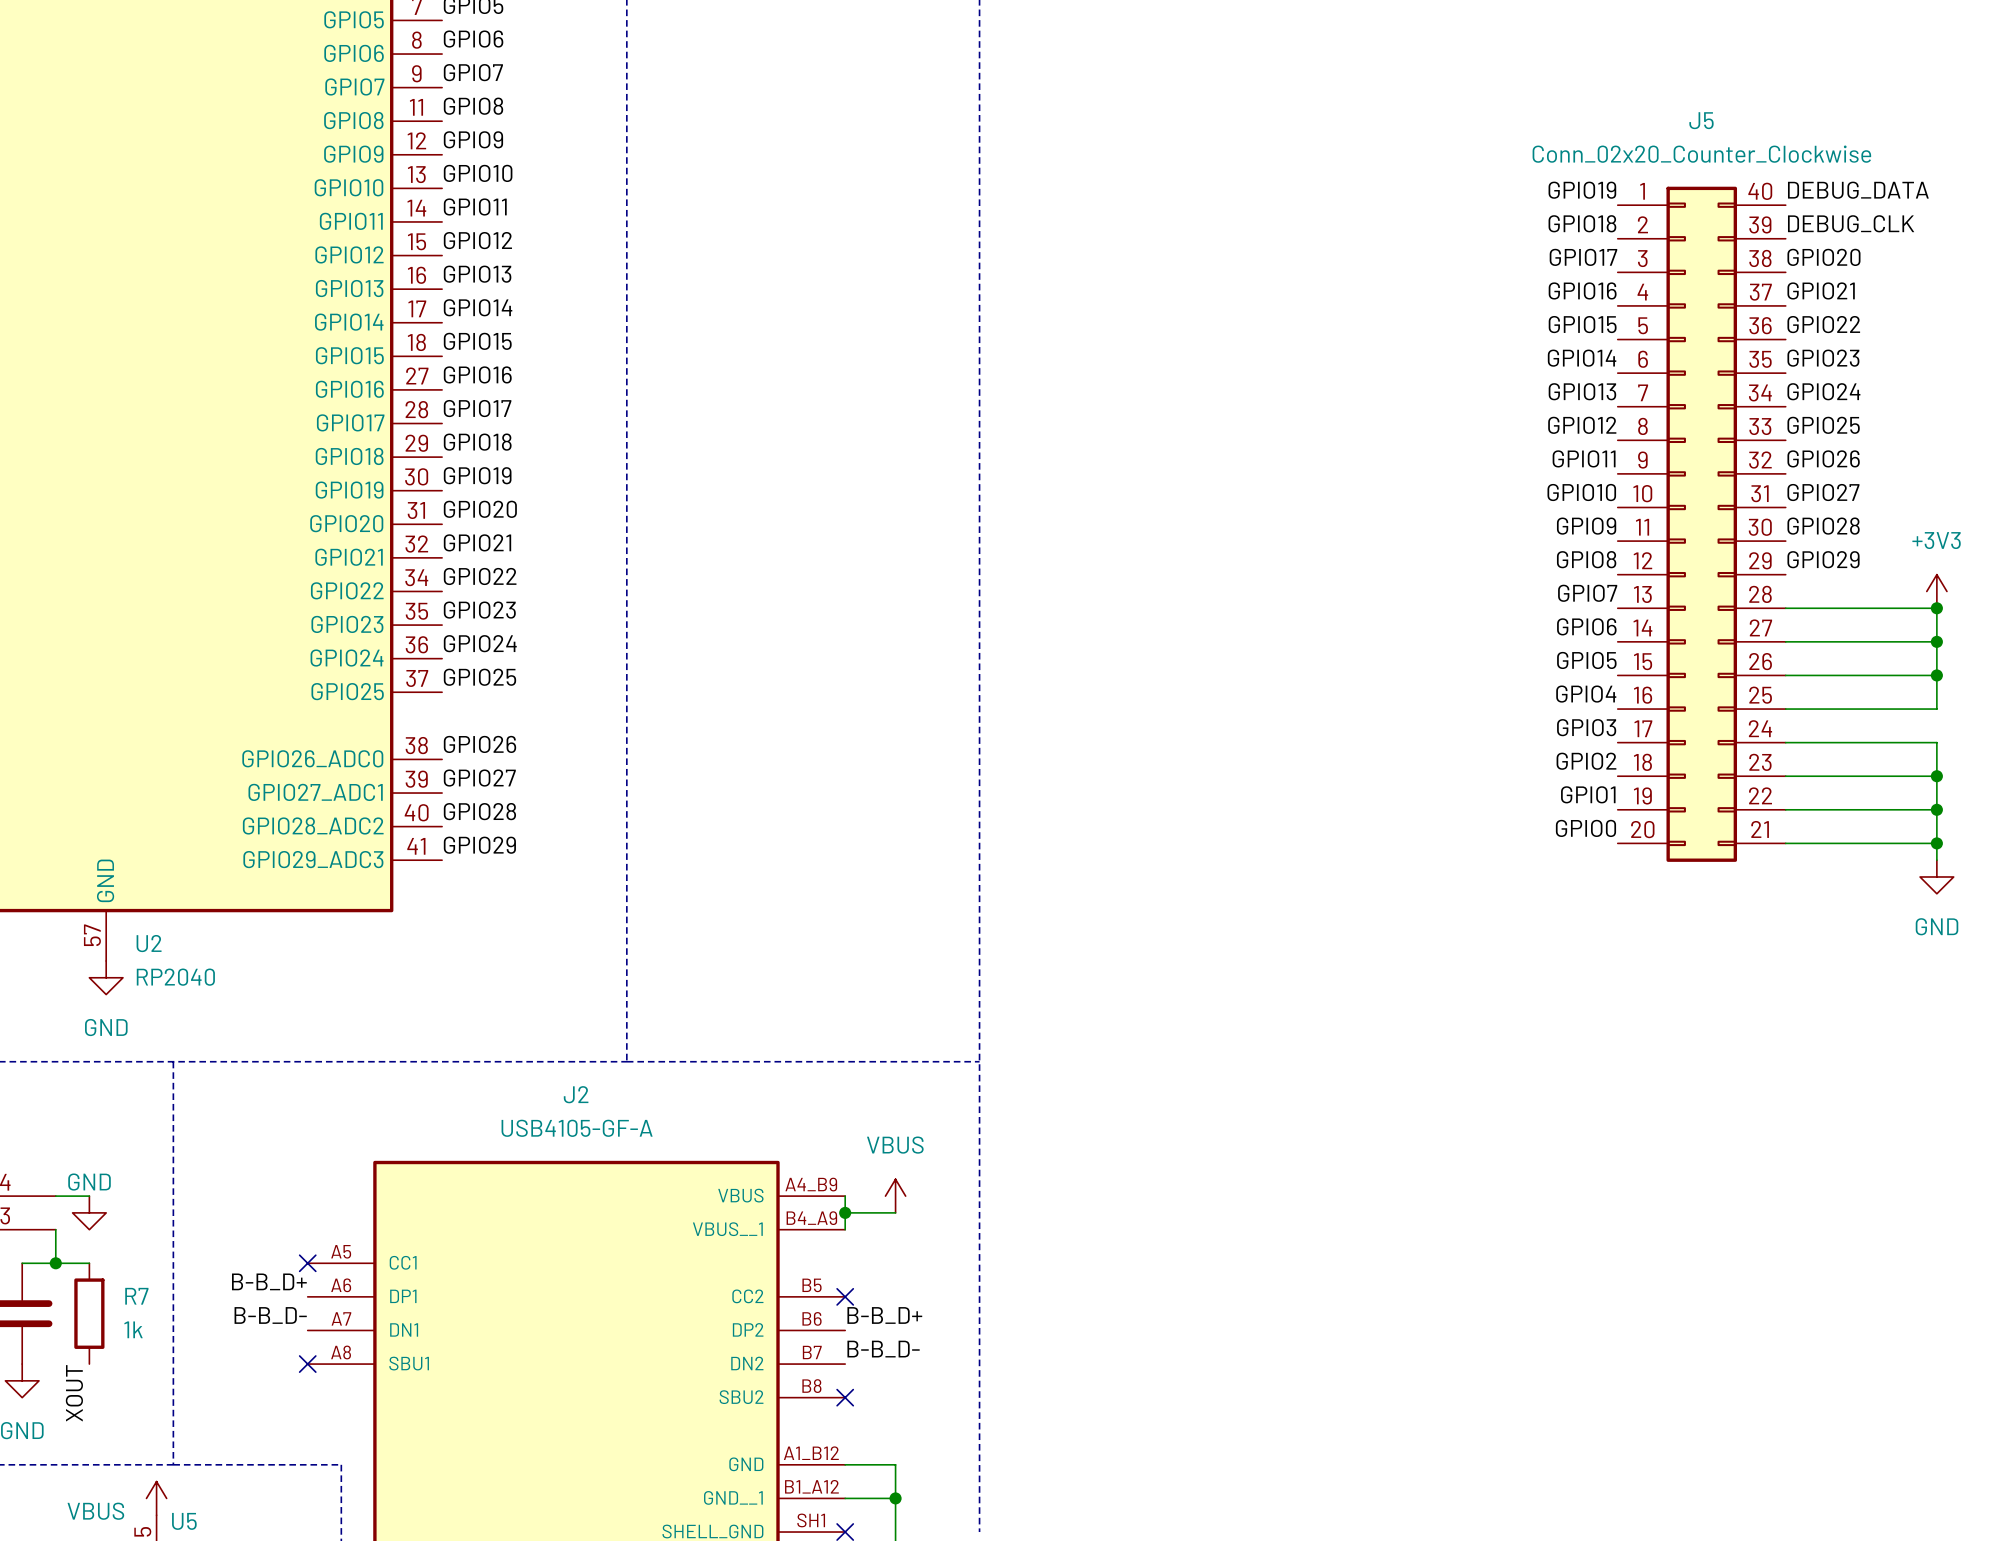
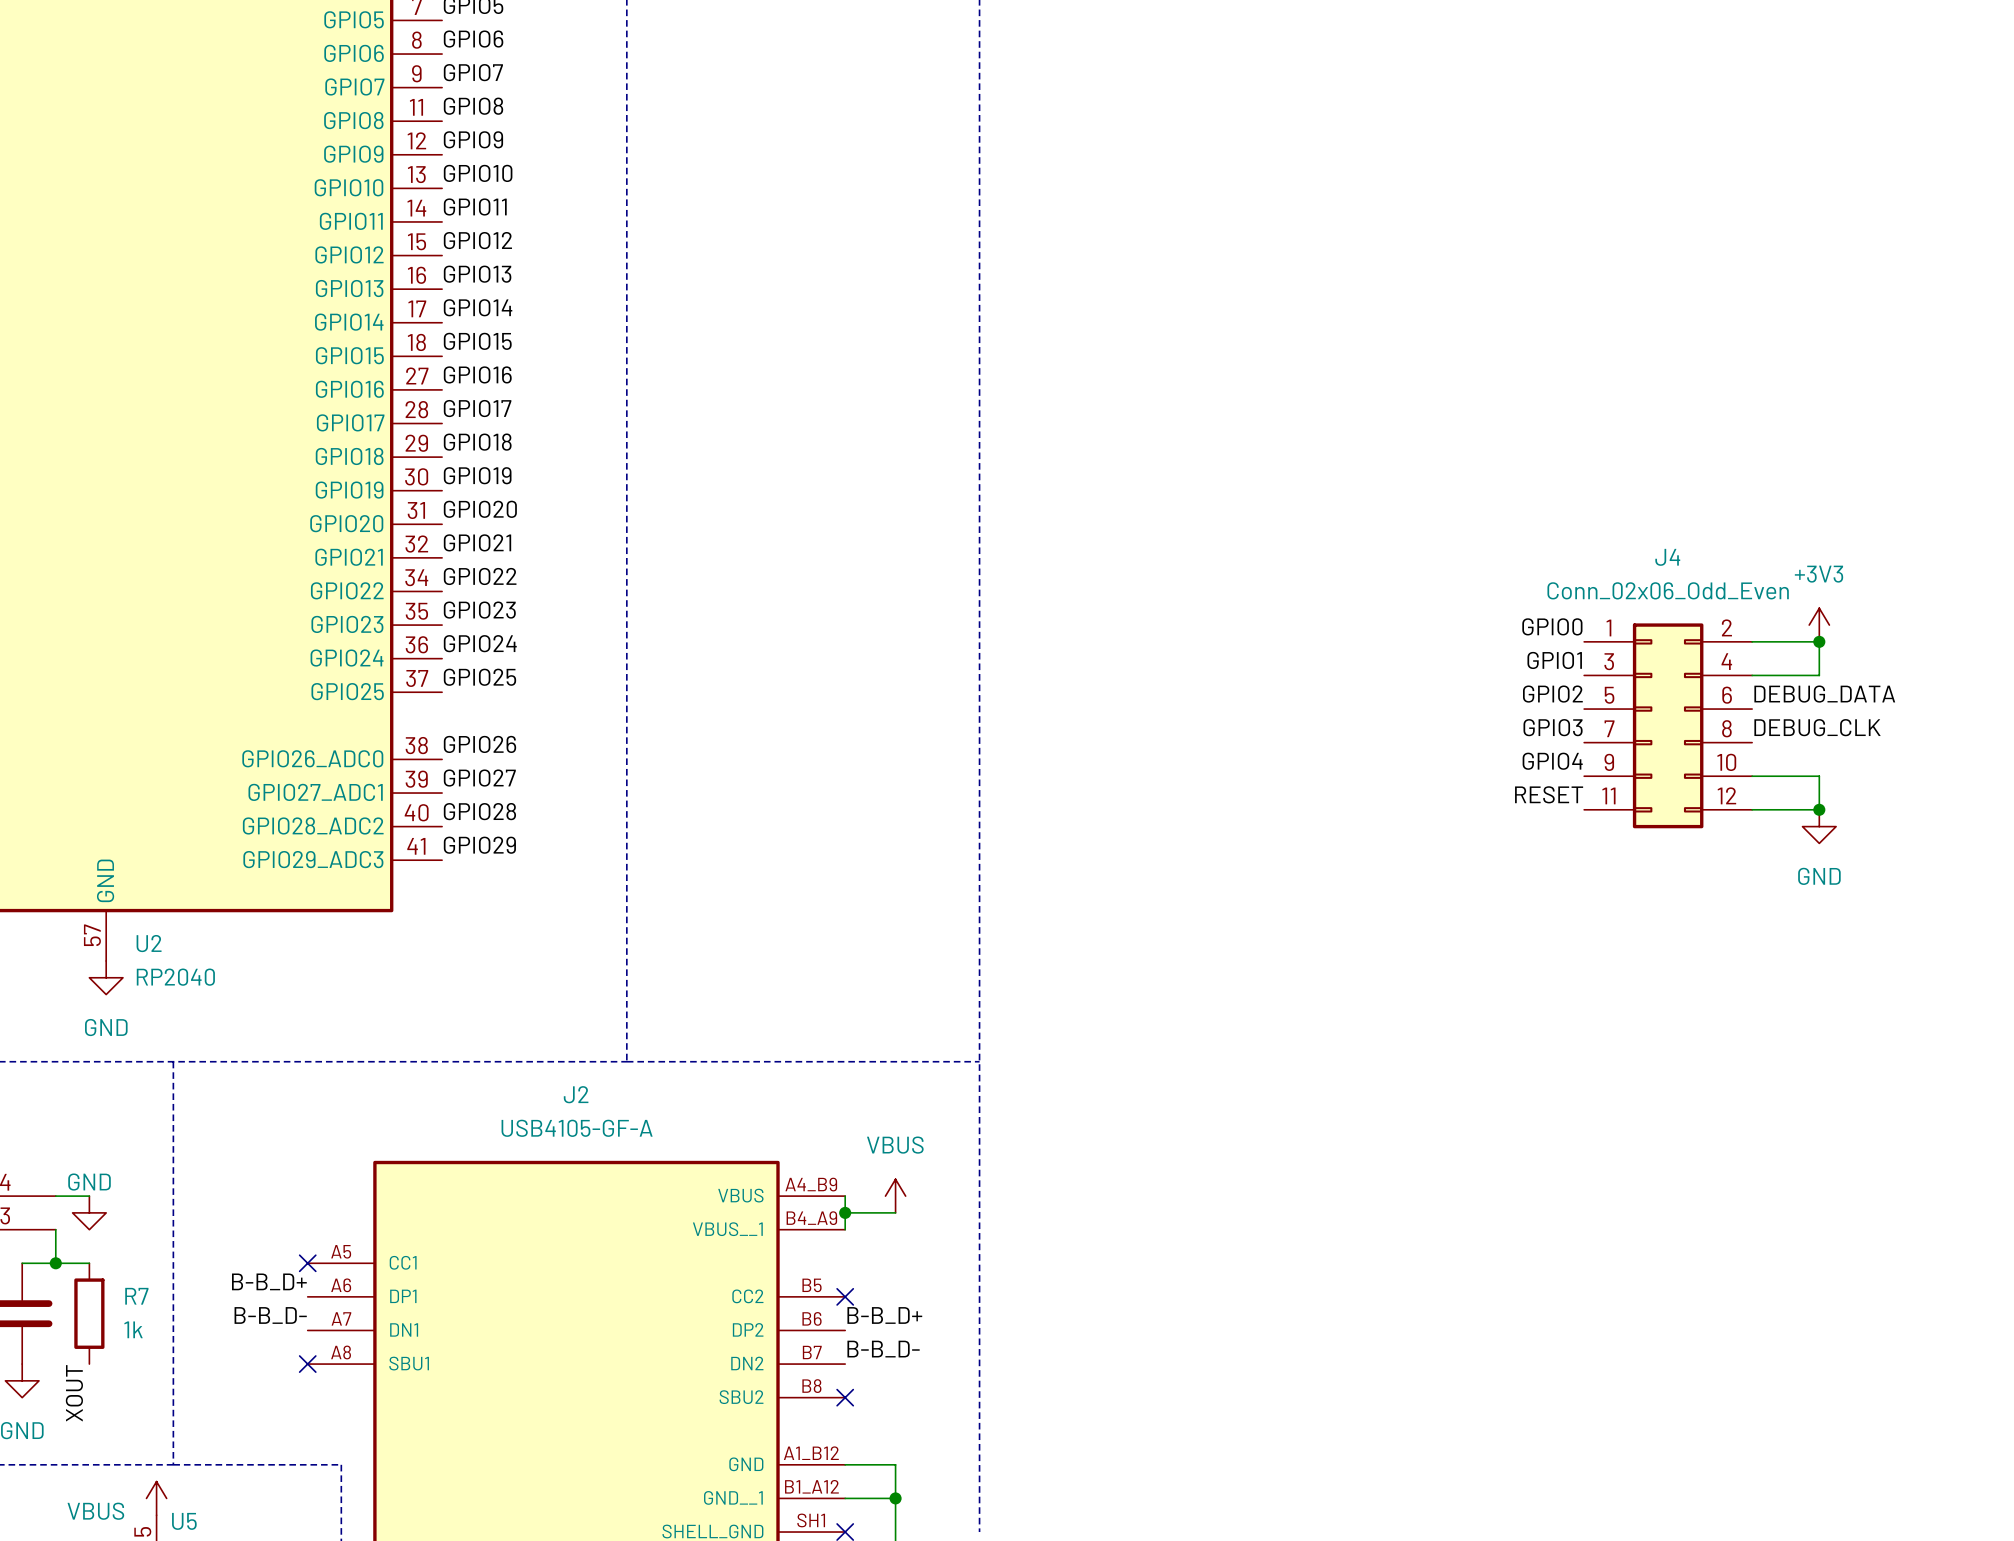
label: GPIO19 (1582, 190) -> none
label: DEBUG_DATA (1858, 190) -> none
label: GPIO18 (1582, 223) -> none
label: DEBUG_CLK (1851, 223) -> none
label: GPIO17 (1583, 257) -> none
label: GPIO20 (1823, 257) -> none
label: GPIO16 (1582, 290) -> none
label: GPIO21 (1821, 290) -> none
label: GPIO15 (1582, 324) -> none
label: GPIO22 (1823, 324) -> none
label: GPIO14 (1582, 358) -> none
label: GPIO23 (1823, 358) -> none
label: GPIO13 (1582, 391) -> none
label: GPIO24 (1823, 391) -> none
label: GPIO12 (1582, 425) -> none
label: GPIO25 (1823, 425) -> none
label: GPIO11 (1584, 458) -> none
label: GPIO26 (1823, 458) -> none
label: GPIO10 (1581, 492) -> none
label: GPIO27 (1823, 492) -> none
J5: Conn_02x20_Counter_Clockwise (1701, 524) -> none
label: GPIO9 (1586, 526) -> none
label: GPIO28 (1823, 526) -> none
label: GPIO8 (1586, 559) -> none
label: GPIO29 (1823, 559) -> none
power symbol position: +3V3 (1936, 591) -> +3V3 (1819, 625)
label: GPIO7 (1587, 593) -> none
wire: (1785, 608) (1936, 608) (1936, 709) (1785, 709) -> none
junction: (1936, 608) -> none
label: GPIO6 (1586, 626) -> none
wire: (1819, 641) (1936, 641) -> (1819, 641) (1819, 675)
junction: none -> (1819, 641)
junction: (1936, 641) -> none
label: GPIO5 (1586, 660) -> none
wire: (1819, 675) (1936, 675) -> none
junction: (1936, 675) -> none
label position: GPIO4 (1586, 694) -> GPIO4 (1552, 761)
label: none -> DEBUG_DATA (1824, 694)
J4: none -> Conn_02x06_Odd_Even (1668, 725)
label position: GPIO3 (1586, 727) -> GPIO3 (1553, 727)
label: none -> DEBUG_CLK (1817, 727)
wire: (1785, 742) (1936, 742) (1936, 860) -> none
label position: GPIO2 (1586, 761) -> GPIO2 (1552, 694)
wire: (1819, 776) (1936, 776) -> (1819, 776) (1819, 809)
junction: (1936, 776) -> none
label: none -> RESET (1549, 794)
label position: GPIO1 (1588, 794) -> GPIO1 (1554, 660)
wire: (1819, 809) (1936, 809) -> none
junction: none -> (1819, 809)
junction: (1936, 809) -> none
label position: GPIO0 (1585, 828) -> GPIO0 (1552, 626)
wire: (1785, 843) (1936, 843) -> none
junction: (1936, 843) -> none
power symbol position: GND (1936, 876) -> GND (1819, 826)

